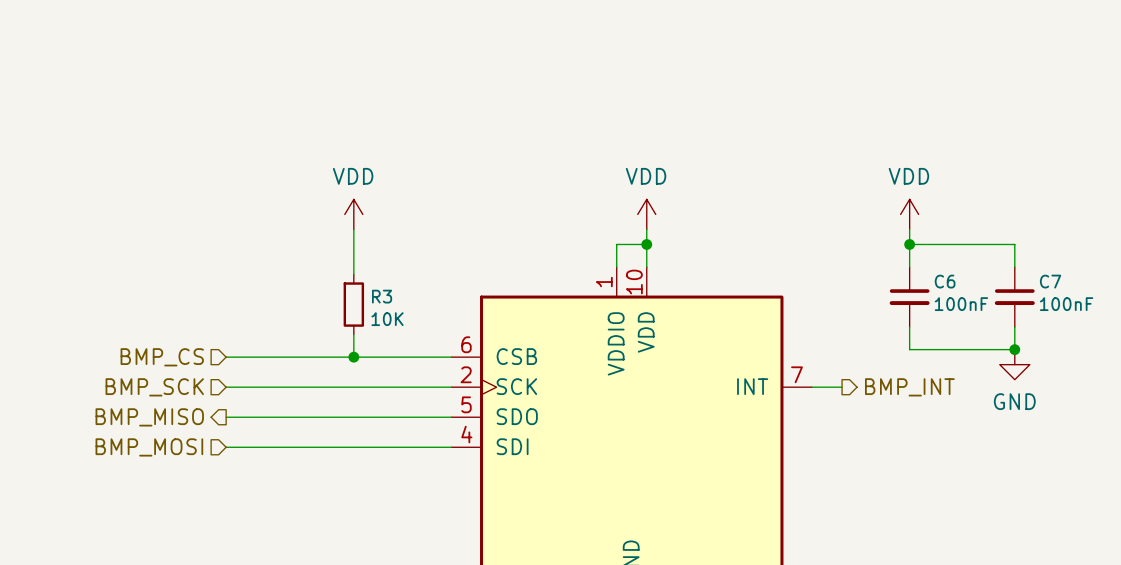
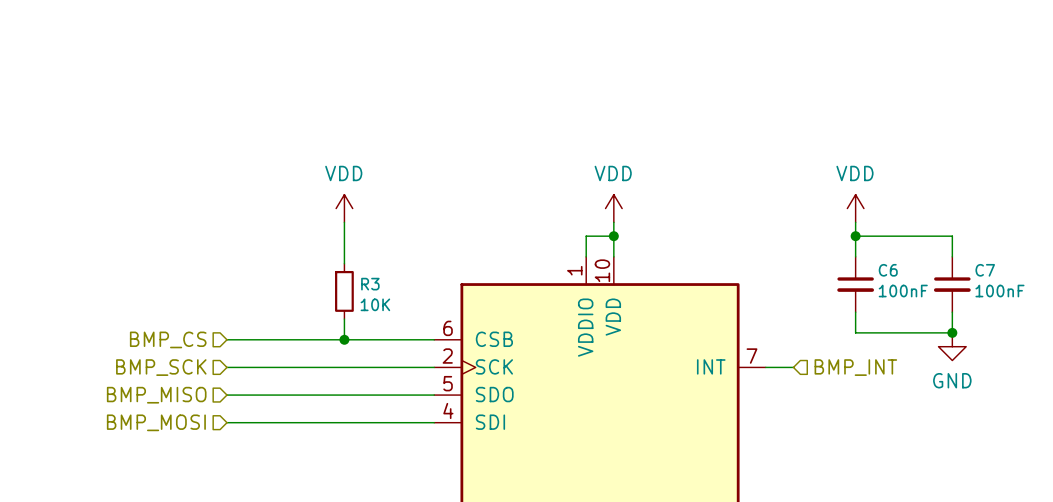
hierarchical label shape: output (909, 387) -> input (855, 367)
hierarchical label shape: output (149, 417) -> input (156, 395)

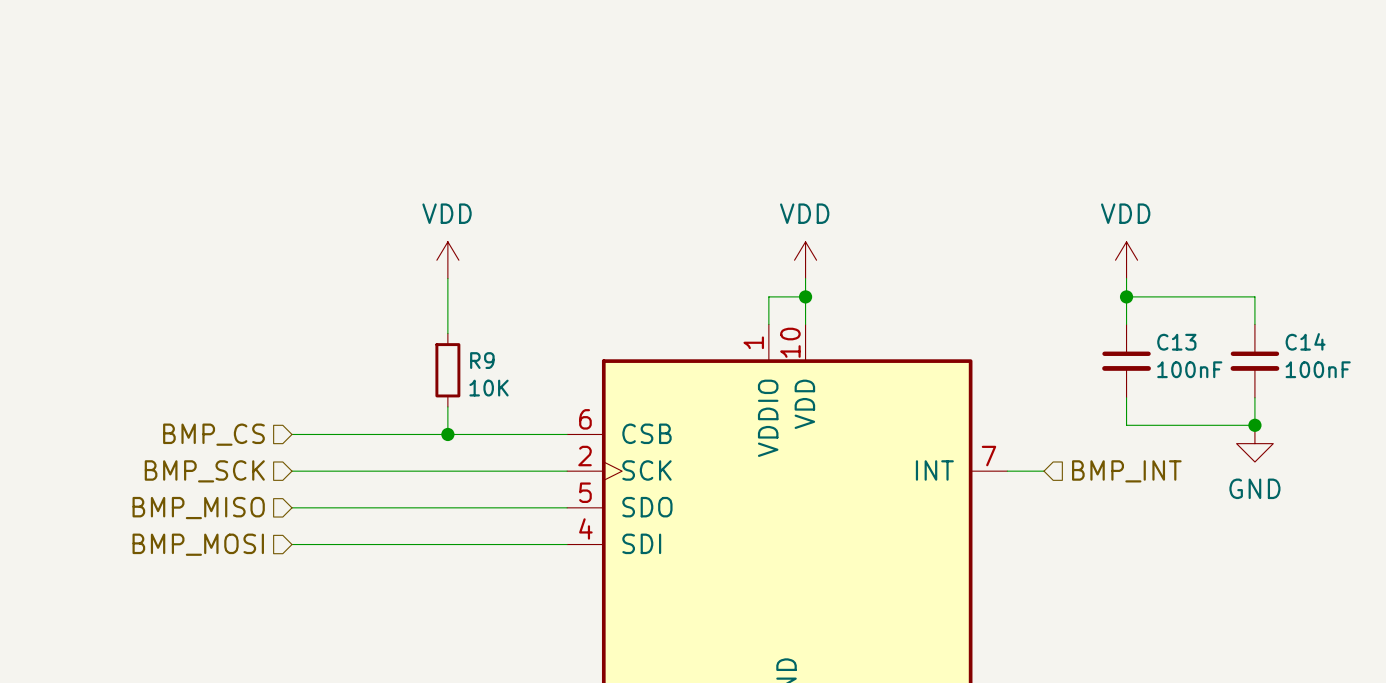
C6 name: C6 (888, 270) -> C13 (1176, 342)
C7 name: C7 (985, 270) -> C14 (1305, 341)
R3 name: R3 (370, 284) -> R9 (482, 360)

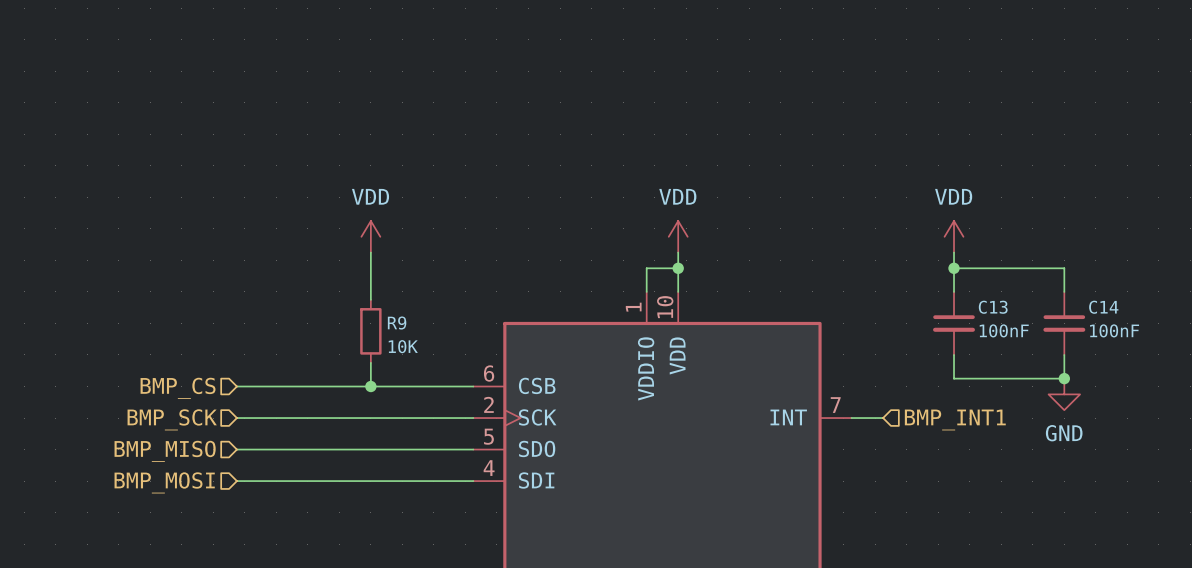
hierarchical label: BMP_INT (1126, 471) -> BMP_INT1 (955, 419)

